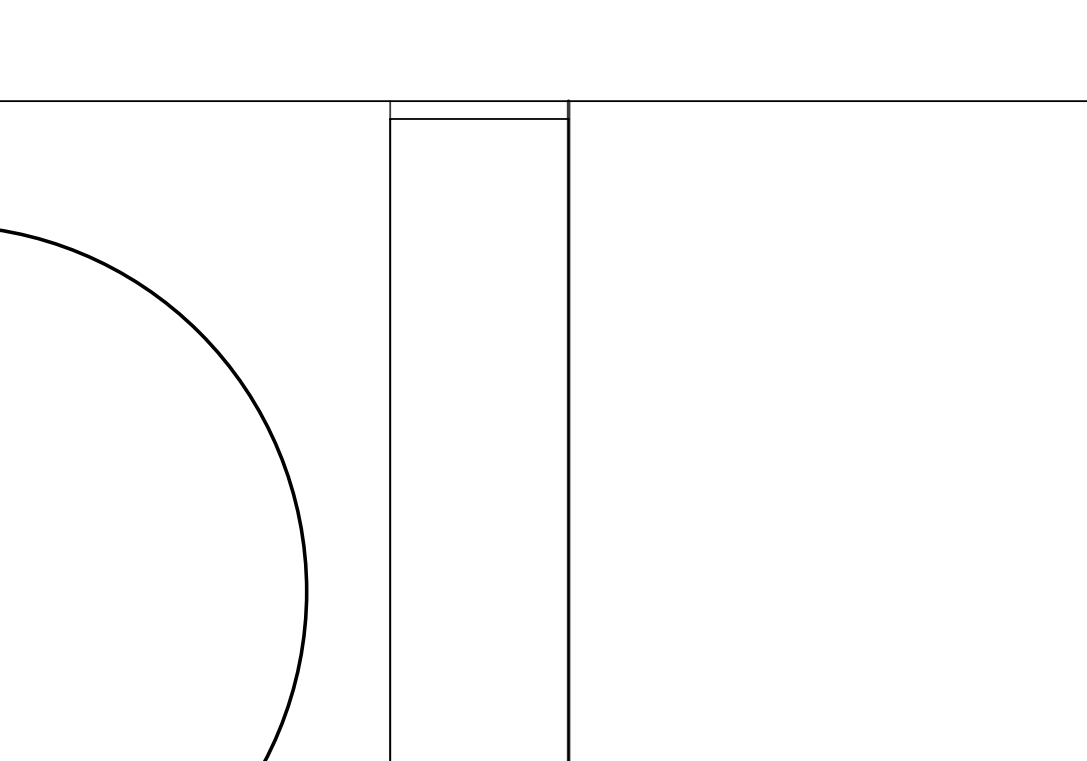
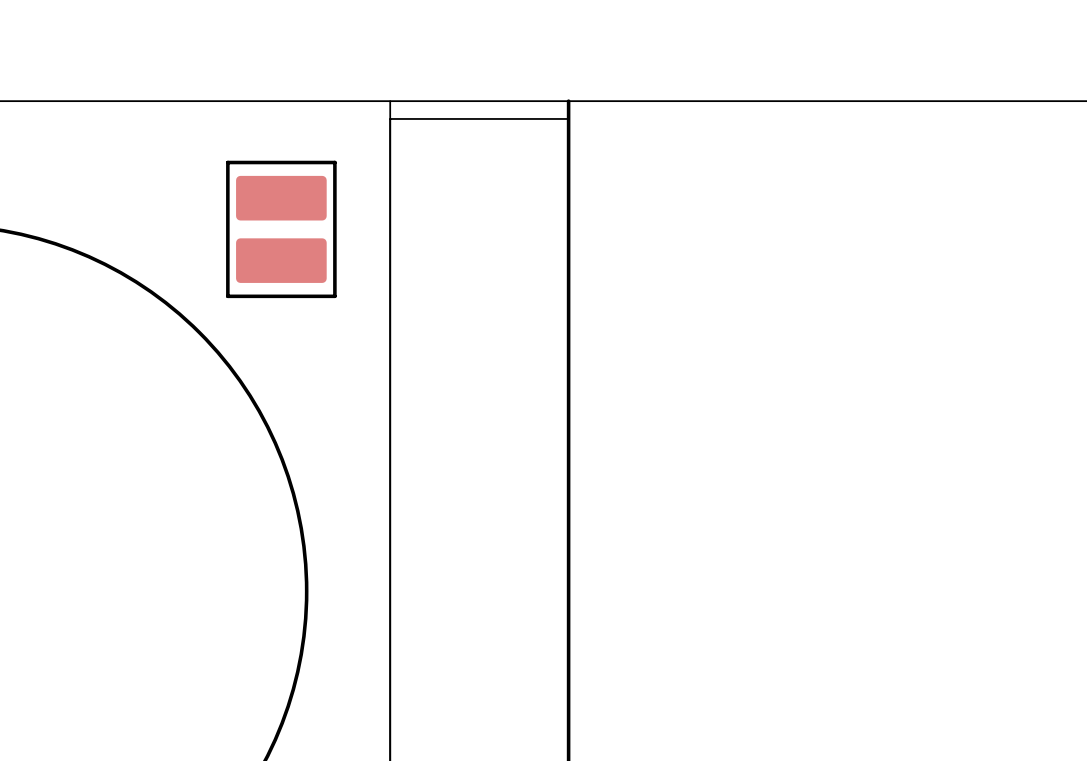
part: none -> (281, 229)

